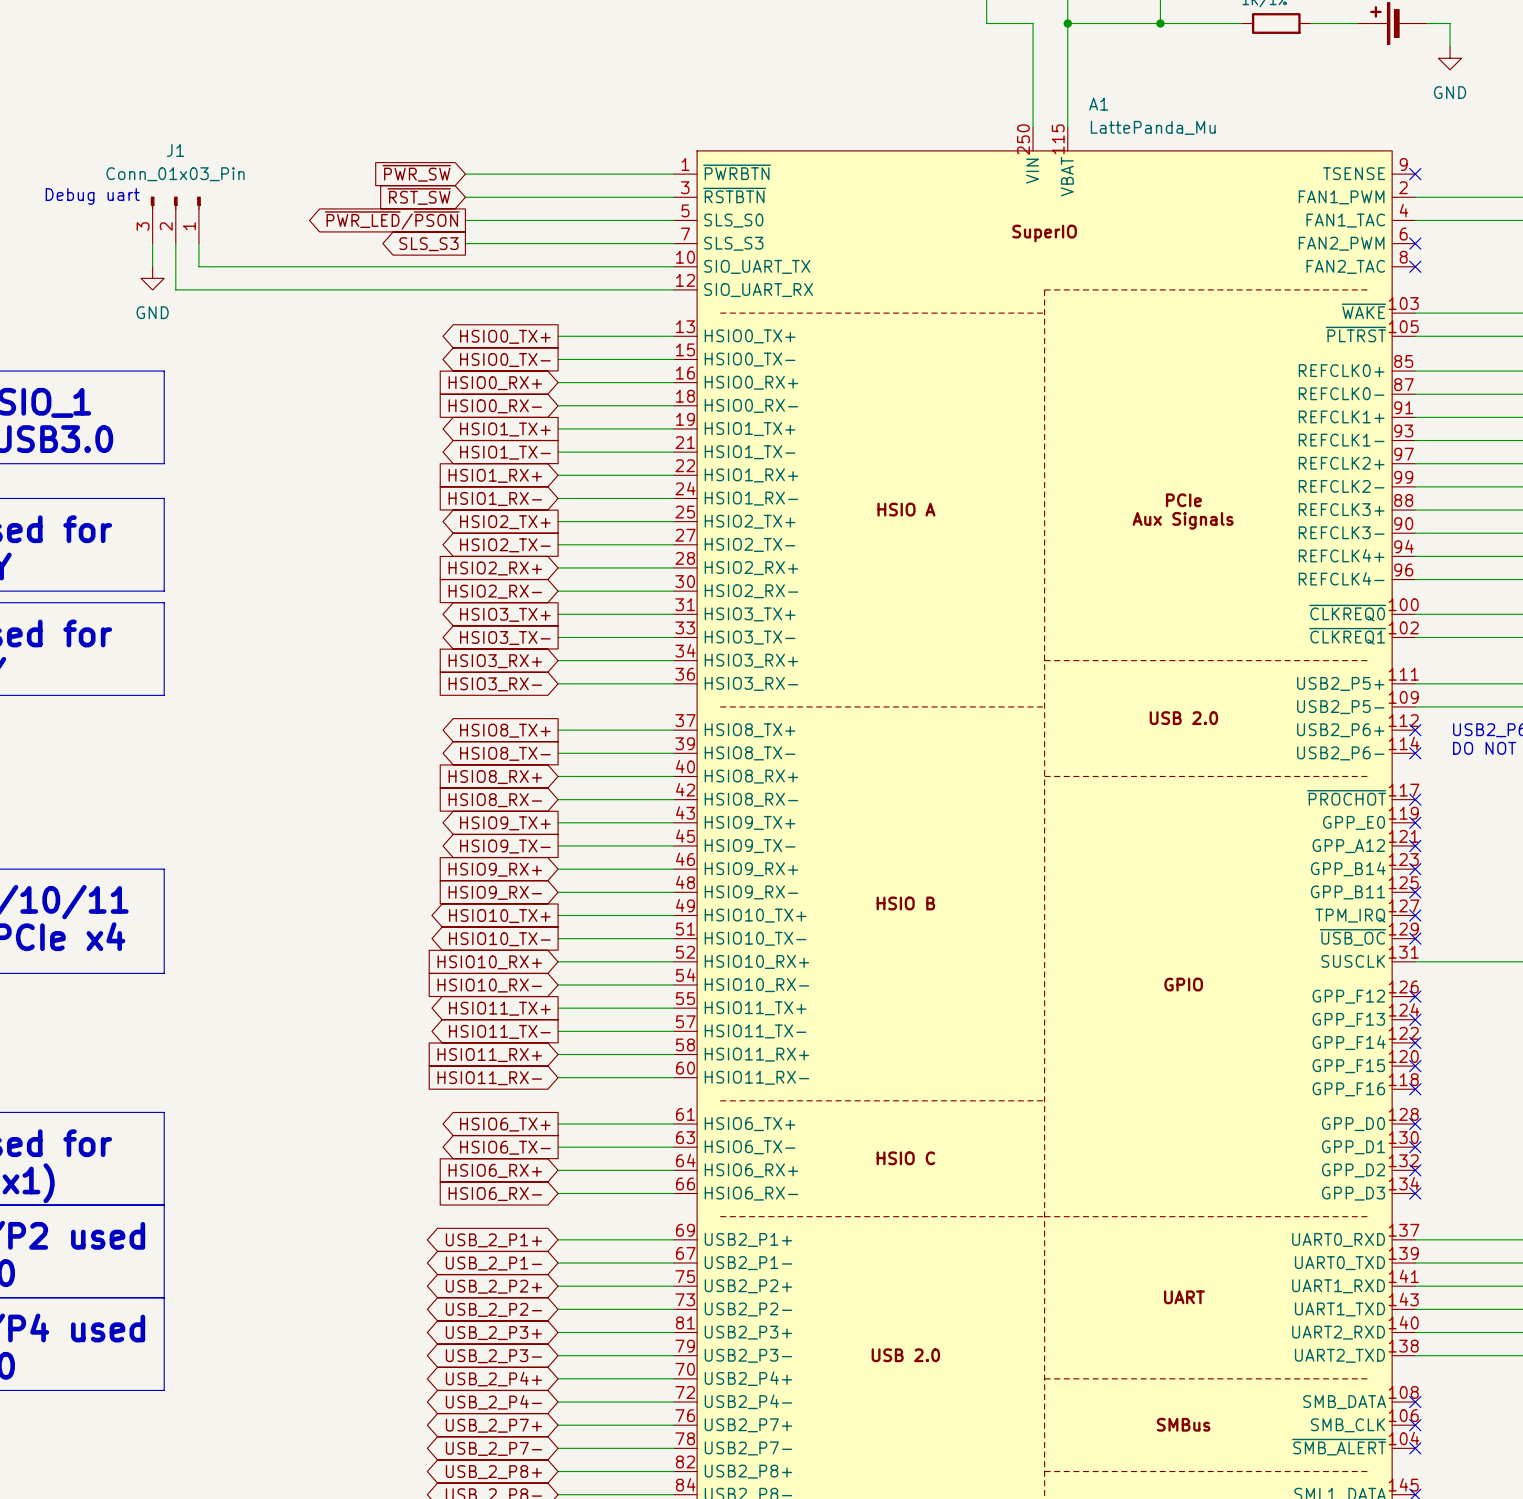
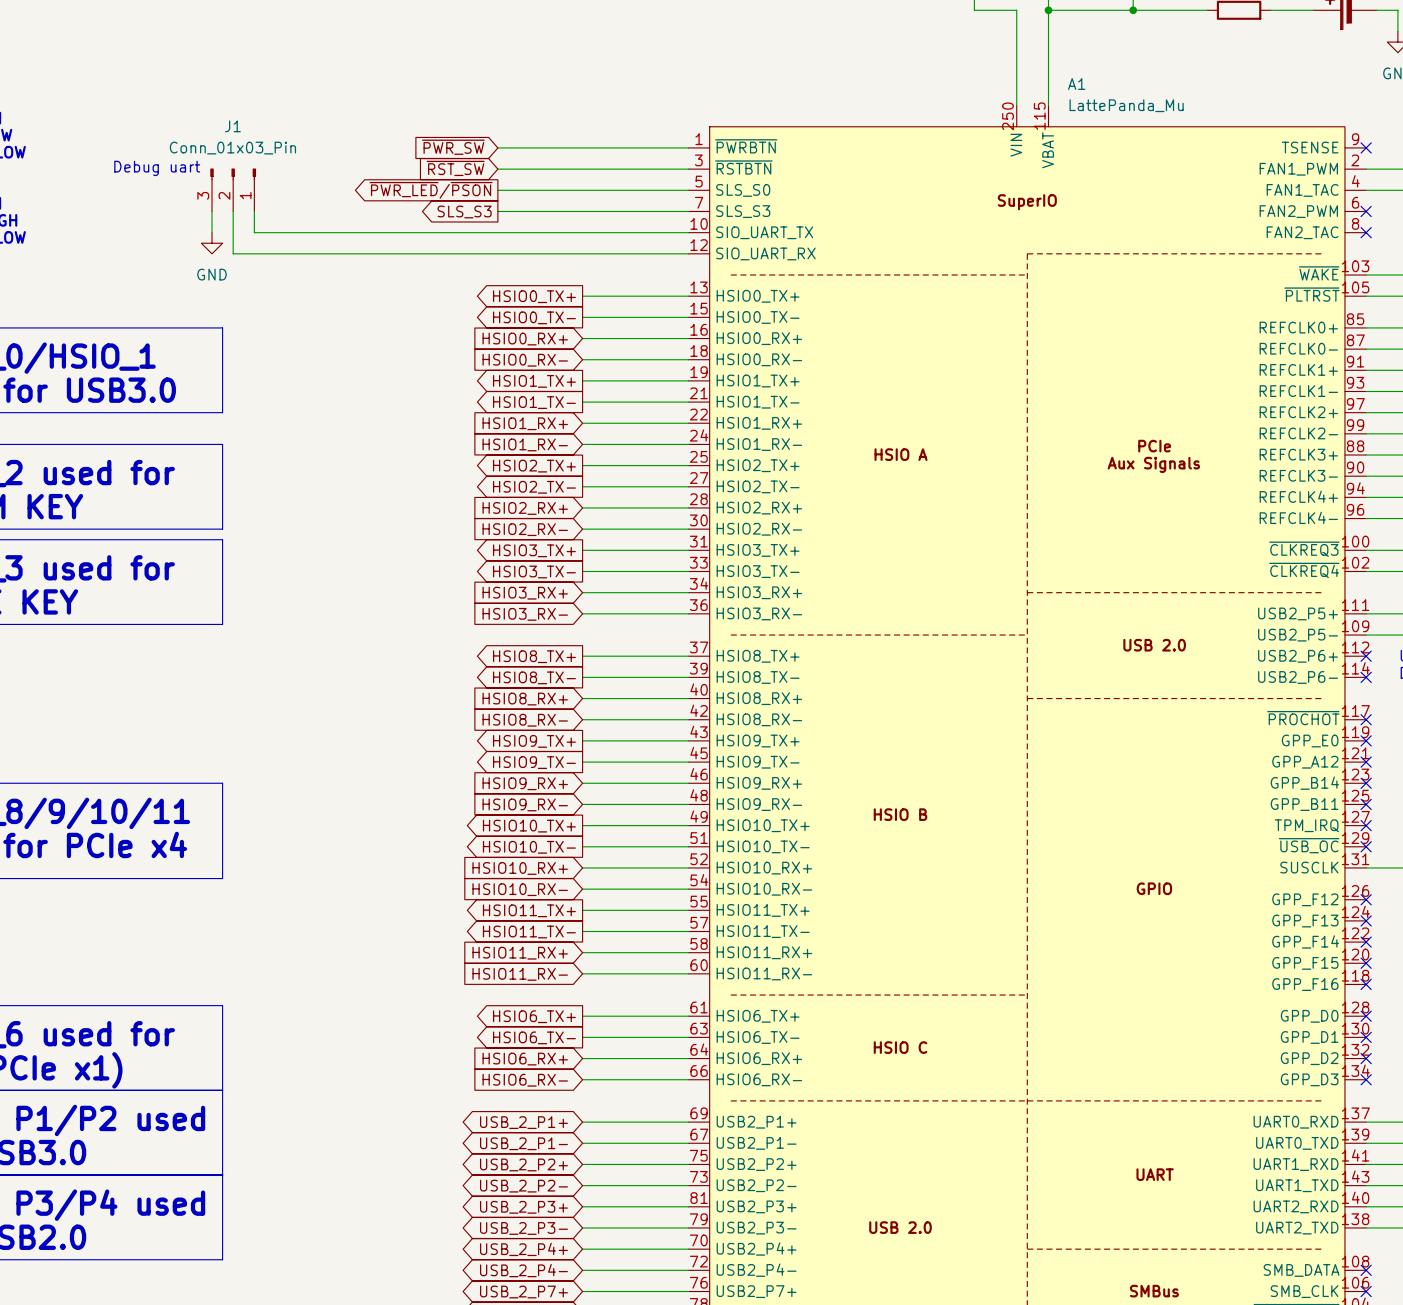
A1 pin name: ~{CLKREQ0} (1347, 613) -> ~{CLKREQ3} (1304, 549)
A1 pin name: ~{CLKREQ1} (1347, 636) -> ~{CLKREQ4} (1304, 570)

